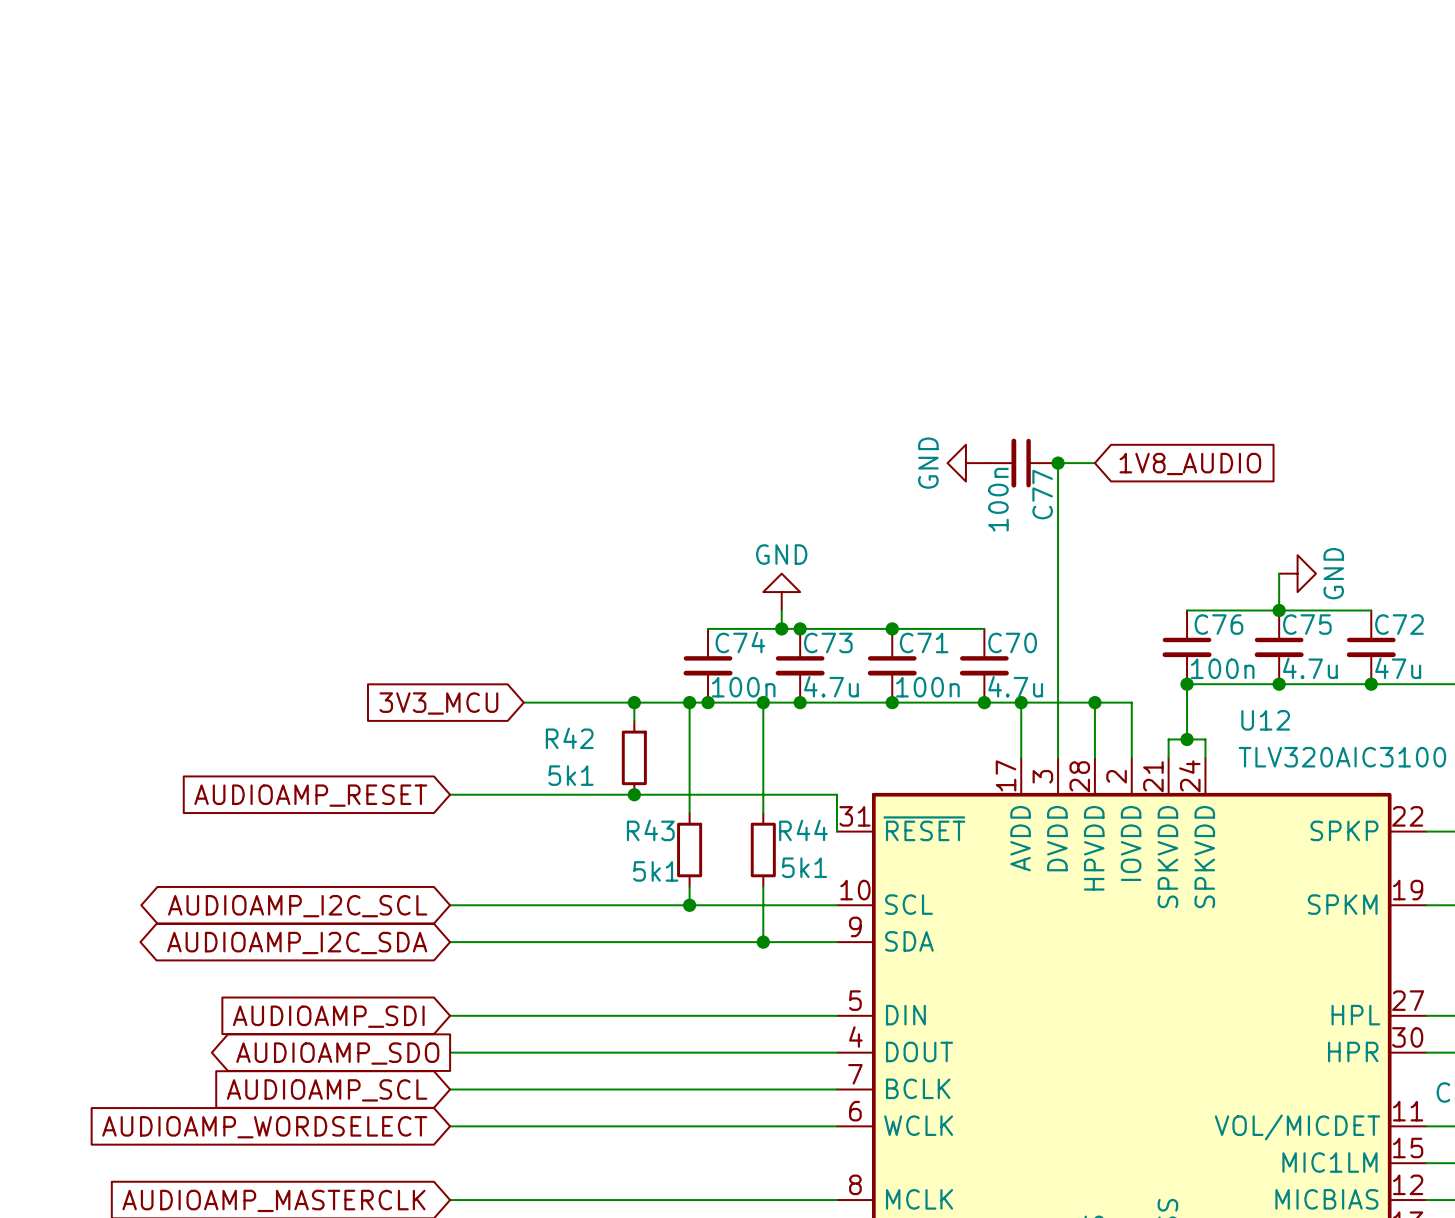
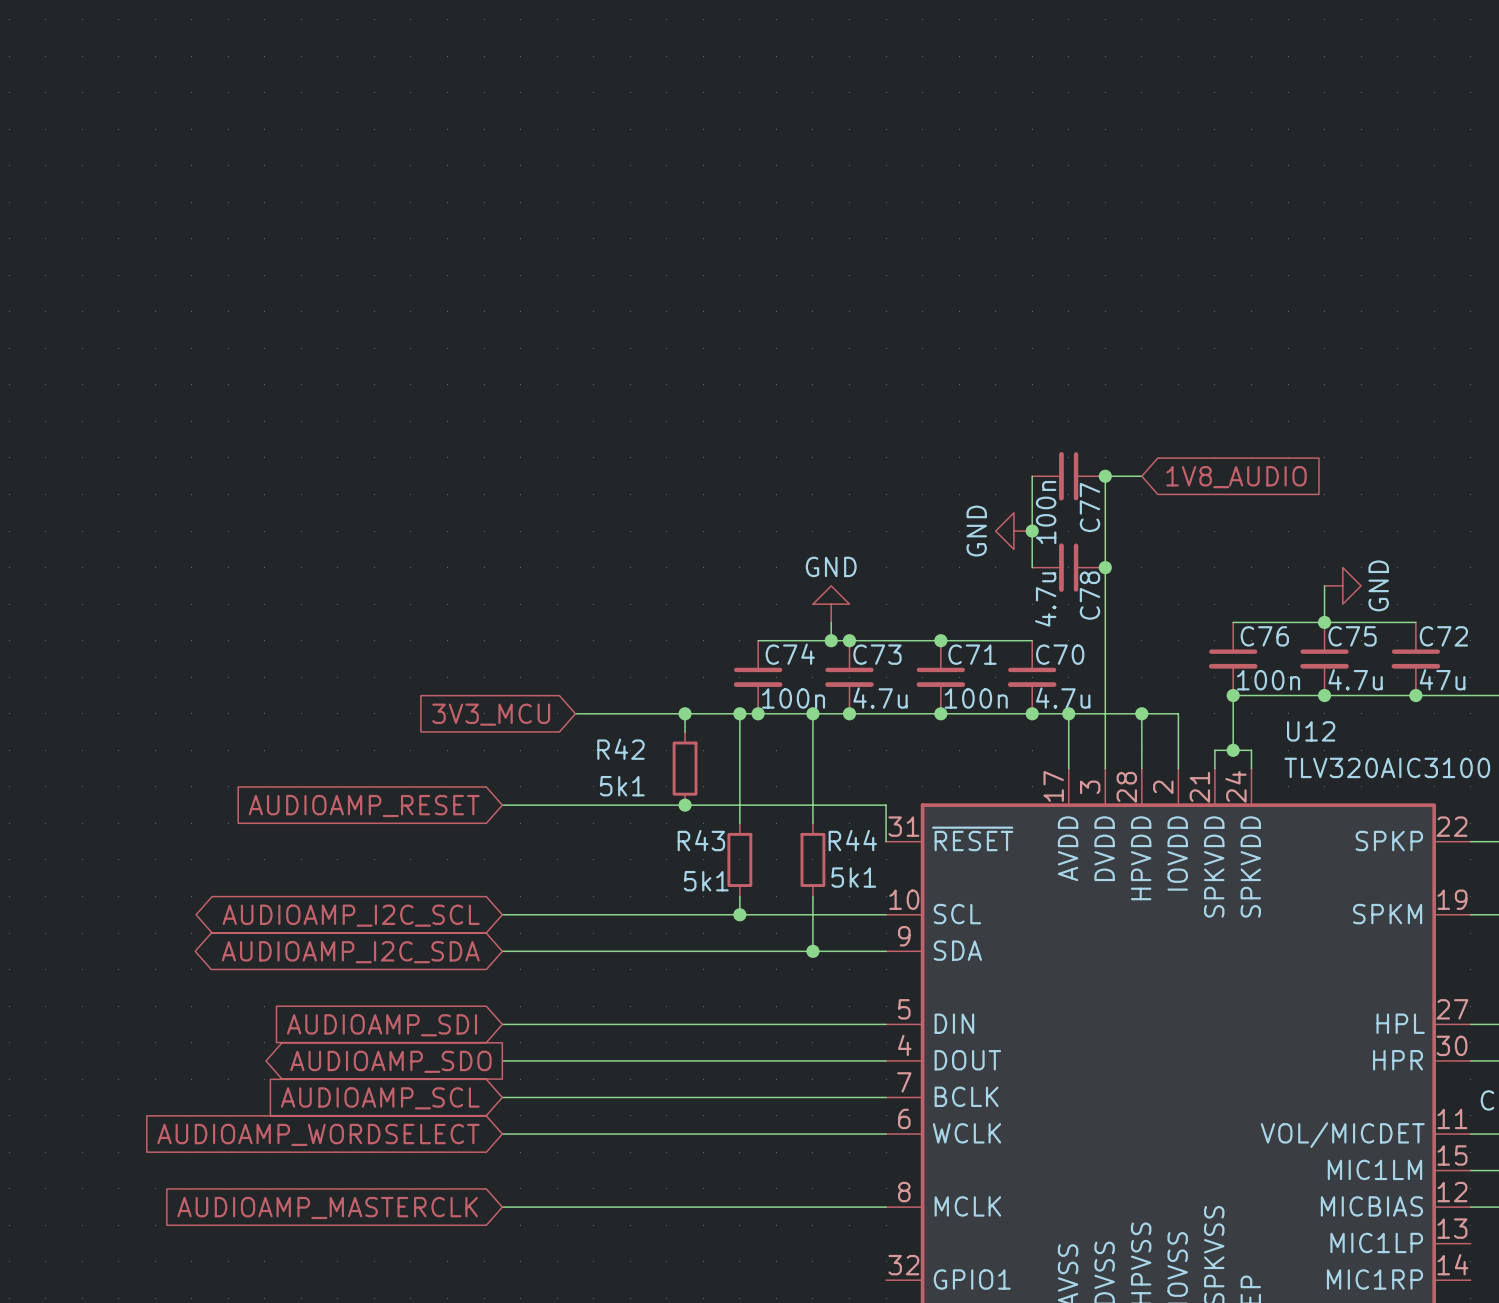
power symbol position: GND (965, 463) -> GND (1013, 531)
wire: none -> (1032, 476) (1032, 567)
junction: none -> (1032, 531)
C78: none -> 4.7u (1068, 567)
junction: none -> (1105, 567)

